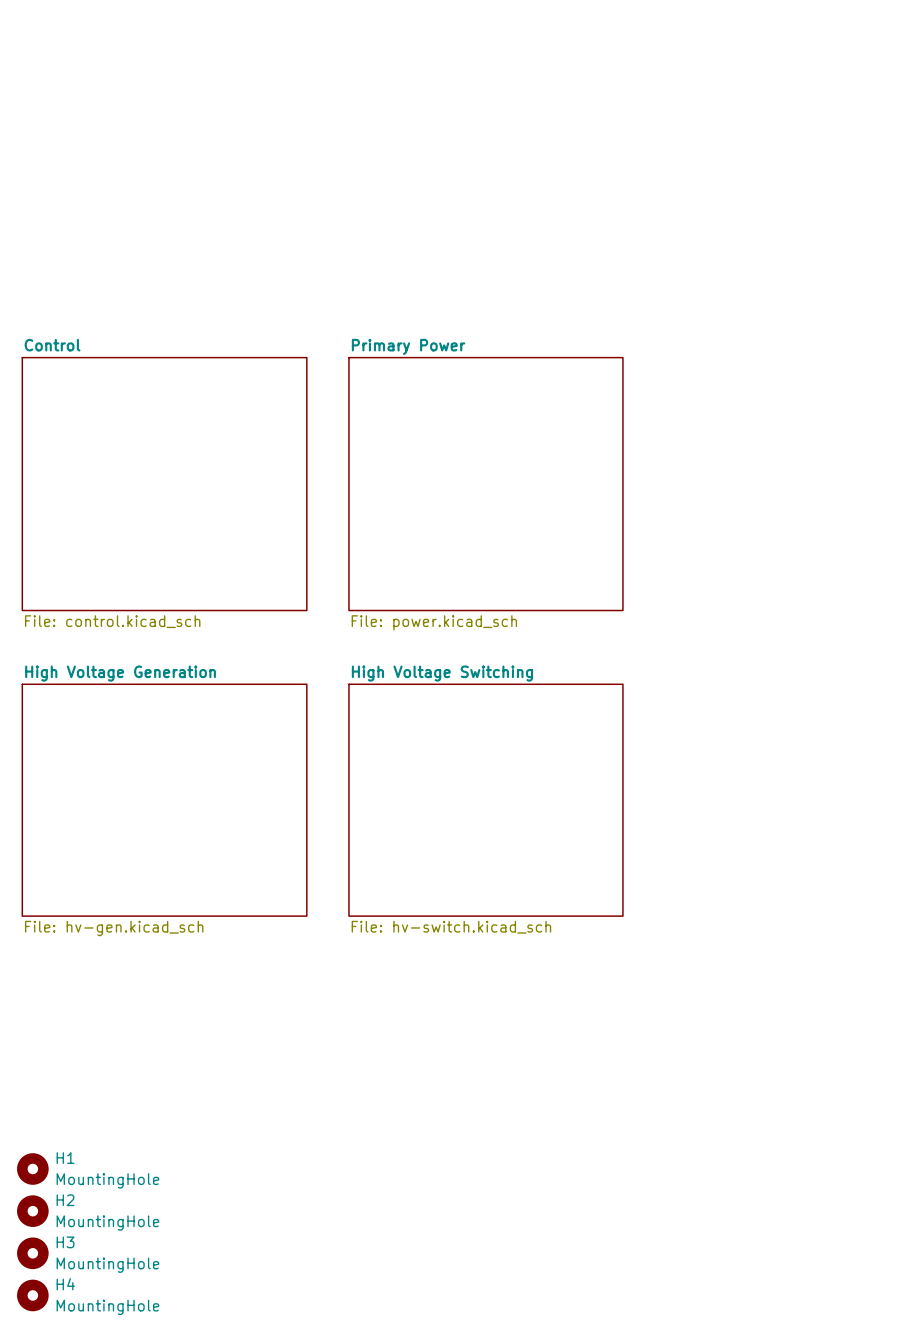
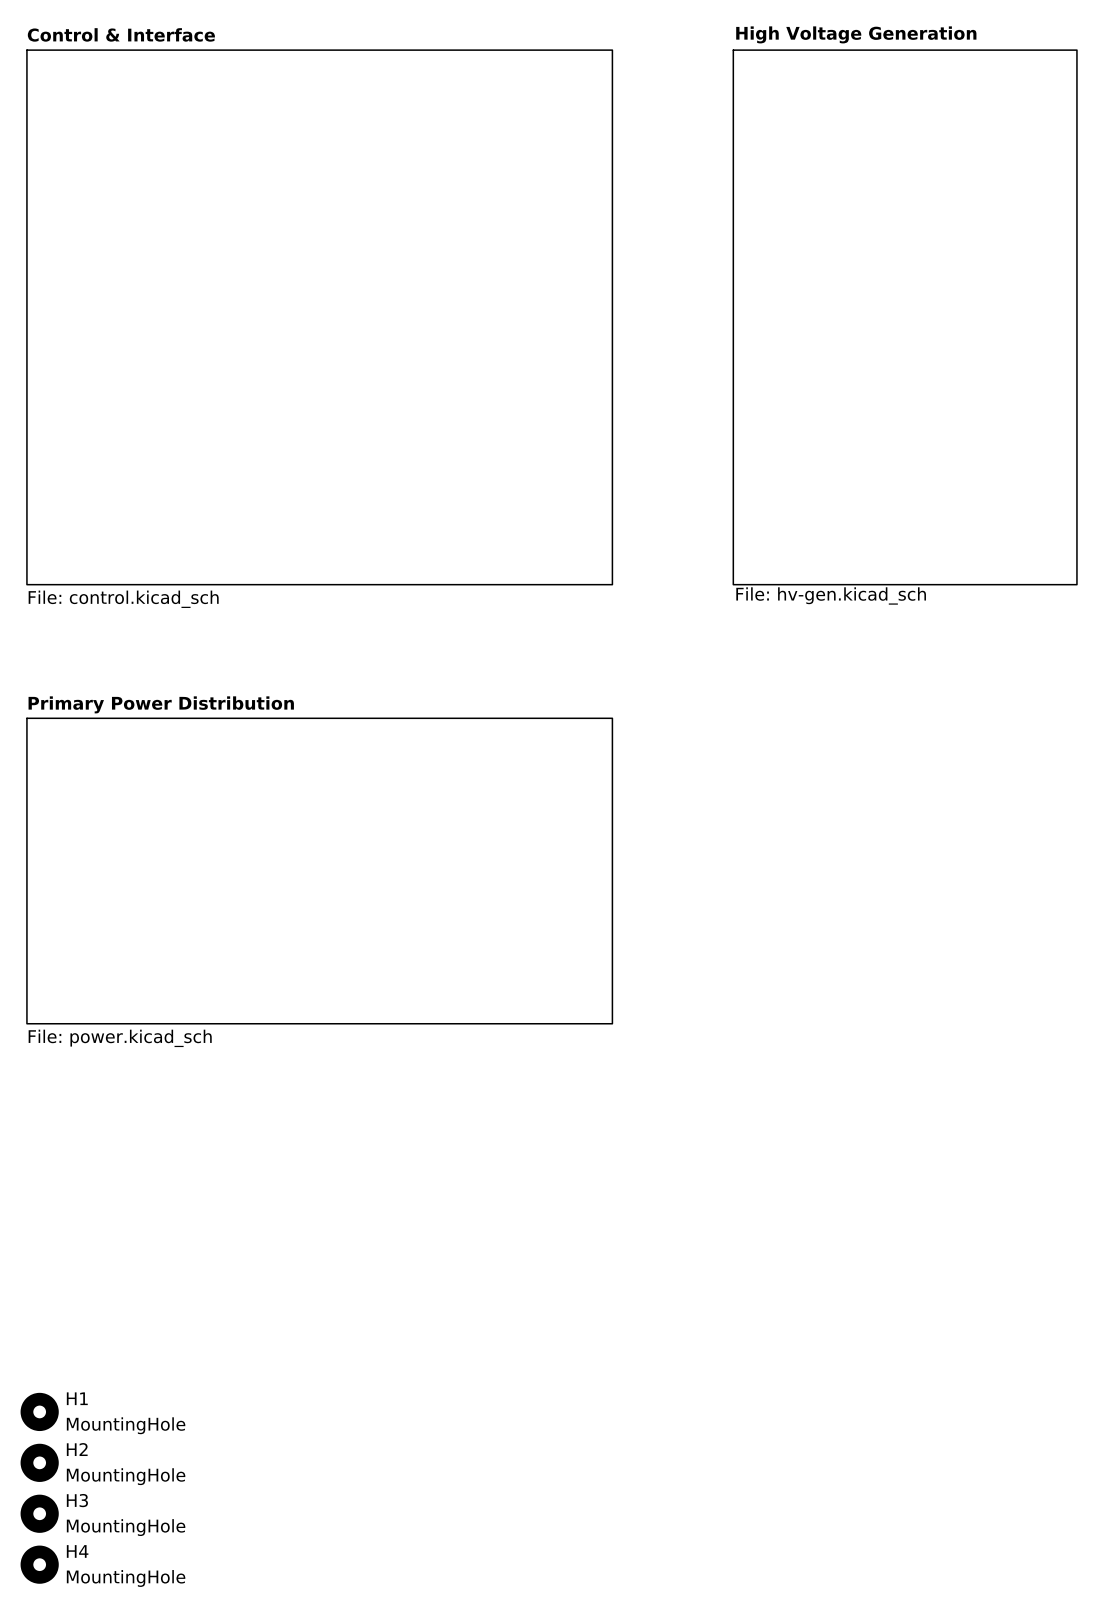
sheet Control & Interface: none -> File: control.kicad_sch (319, 317)
sheet High Voltage Generation: none -> File: hv-gen.kicad_sch (905, 317)
sheet Control: File: control.kicad_sch (164, 484) -> none
sheet Primary Power: File: power.kicad_sch (485, 484) -> none
sheet Primary Power Distribution: none -> File: power.kicad_sch (319, 871)
sheet High Voltage Generation: File: hv-gen.kicad_sch (164, 800) -> none
sheet High Voltage Switching: File: hv-switch.kicad_sch (485, 800) -> none

